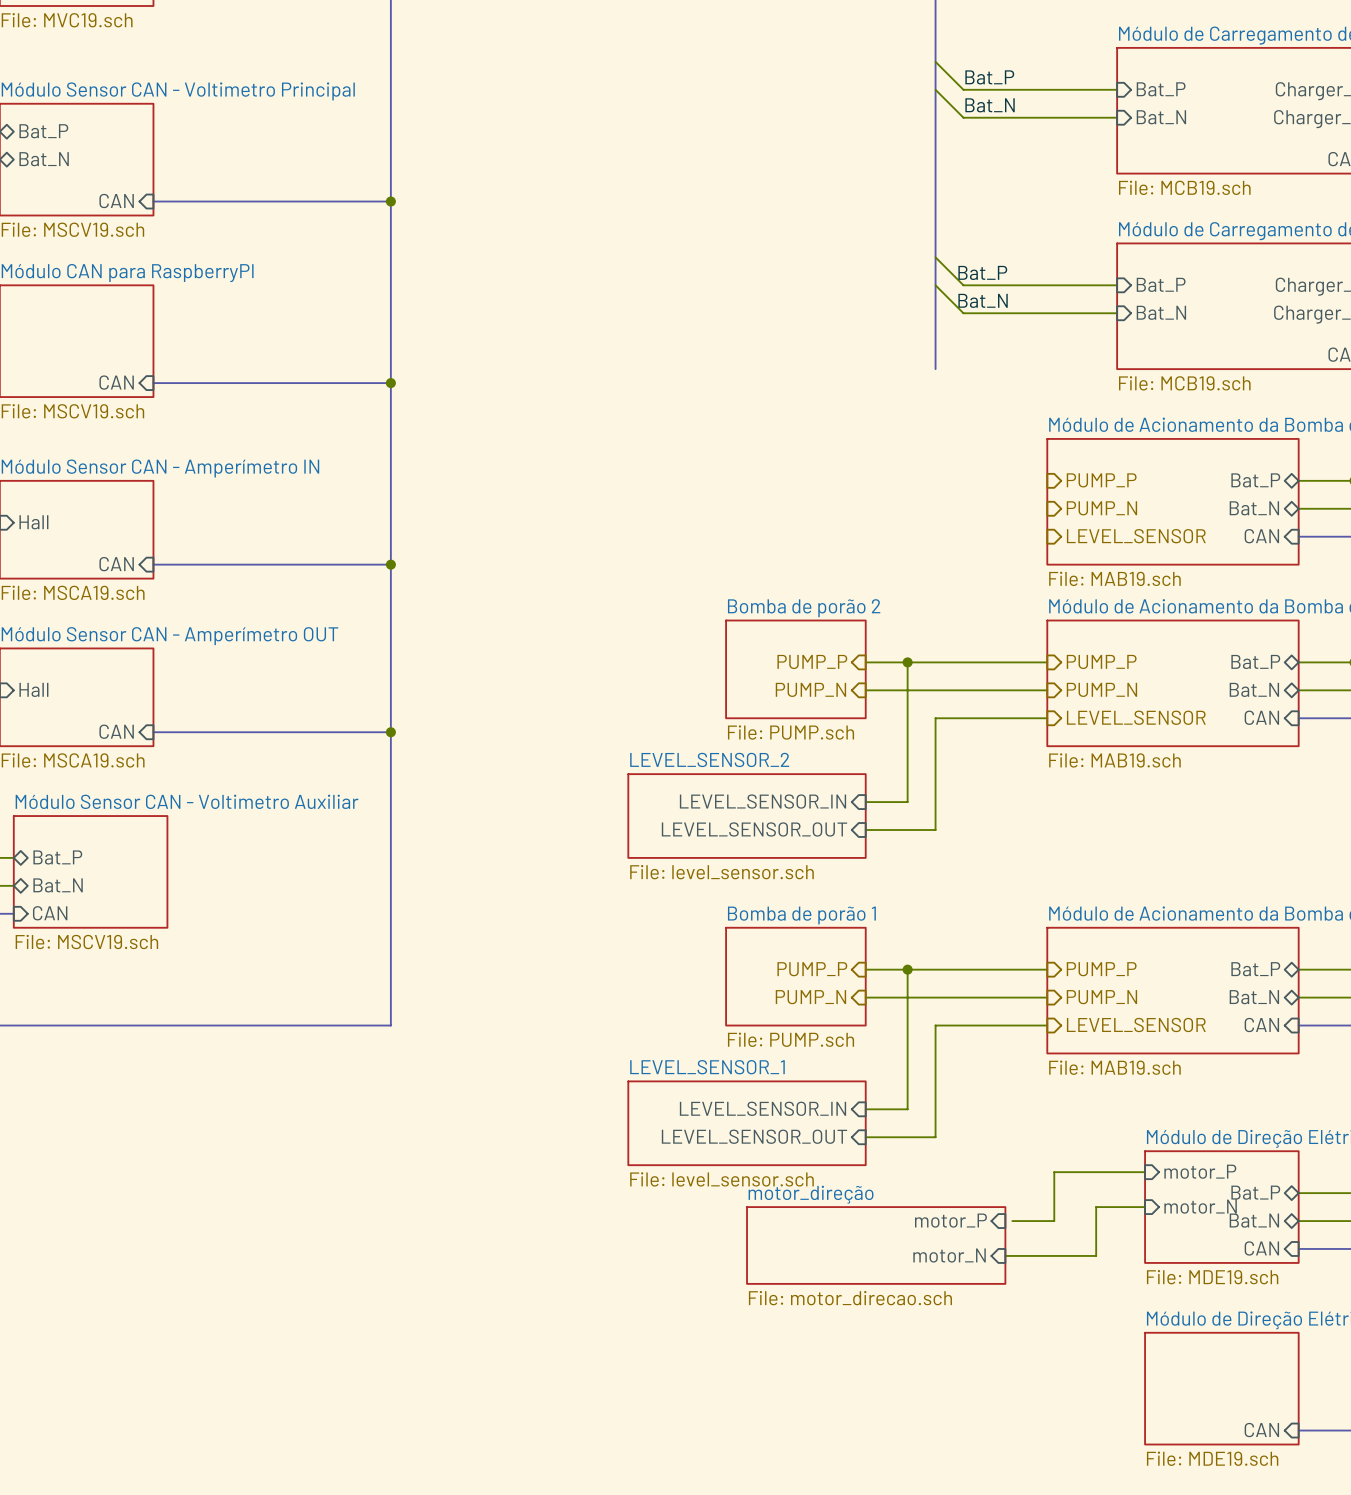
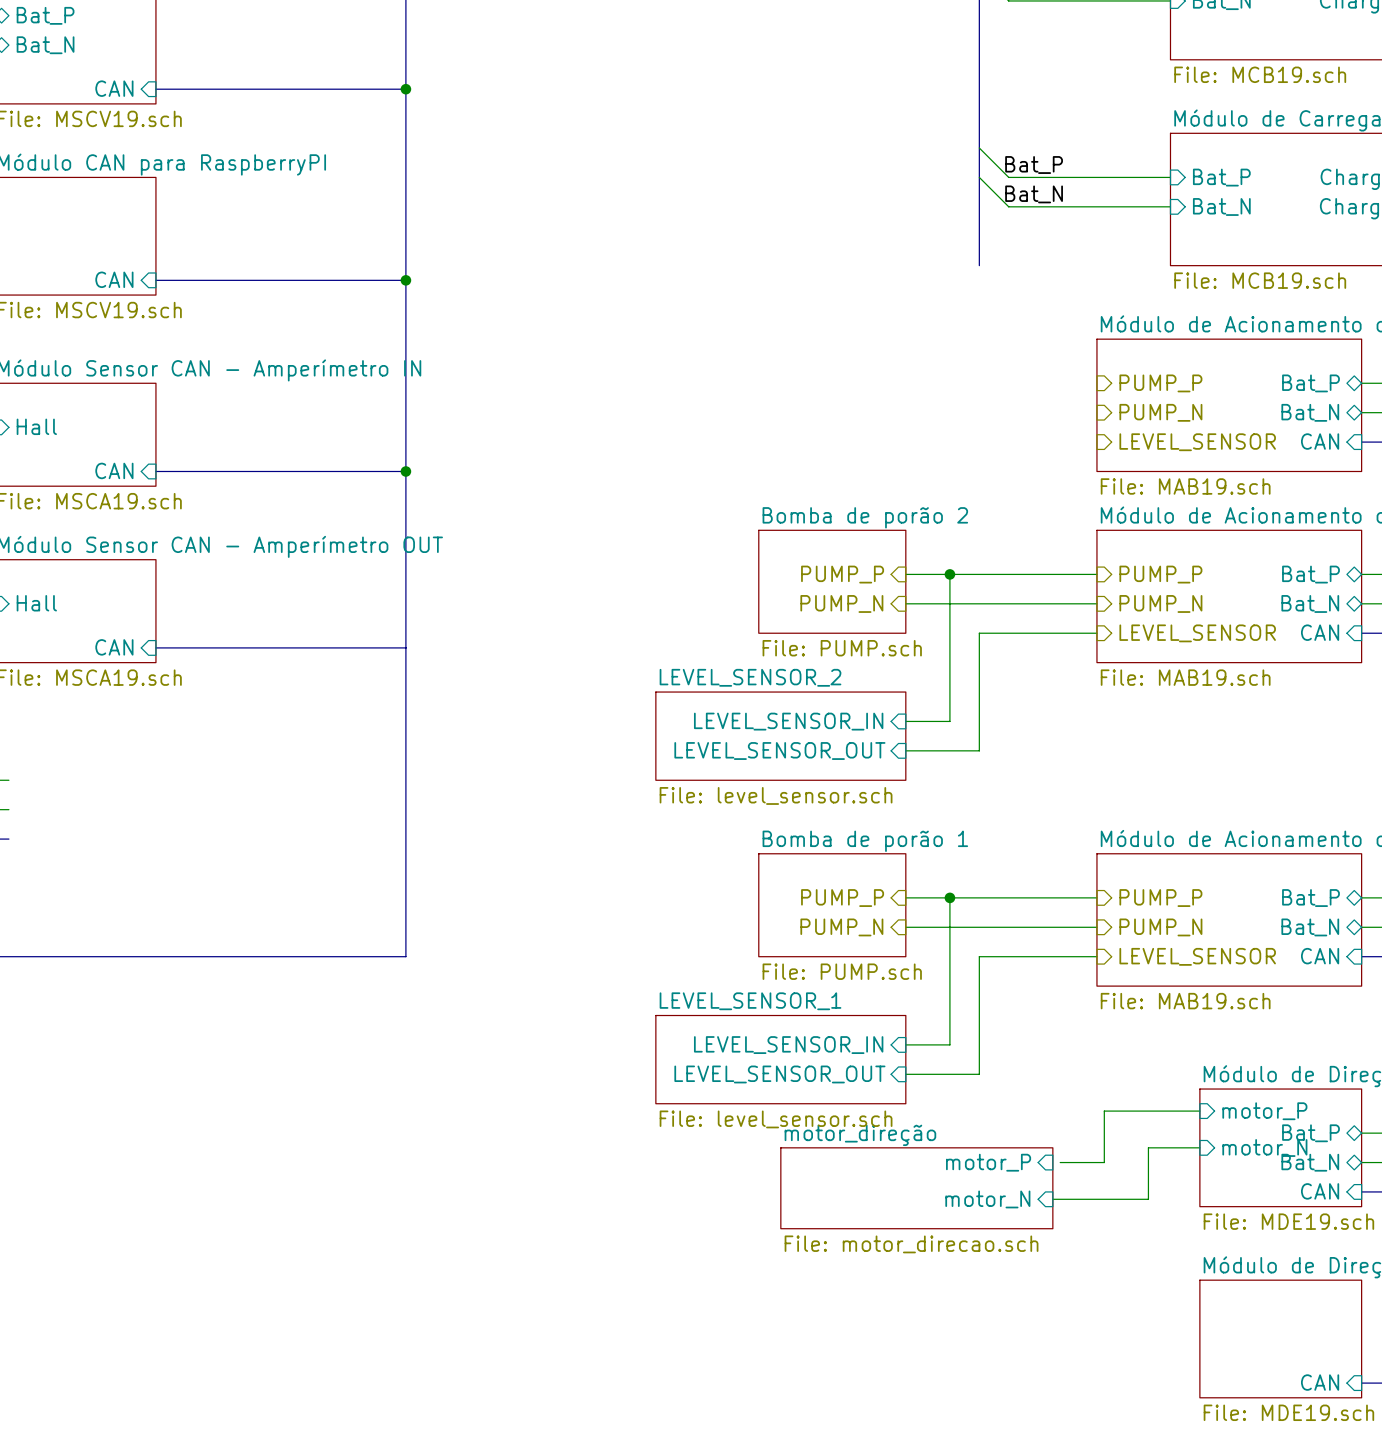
junction: (390, 732) -> none
sheet pin: Bat_P (57, 857) -> none
sheet Módulo Sensor CAN - Voltimetro Auxiliar: File: MSCV19.sch (90, 871) -> none
sheet pin: Bat_N (58, 885) -> none
sheet pin: CAN (50, 913) -> none

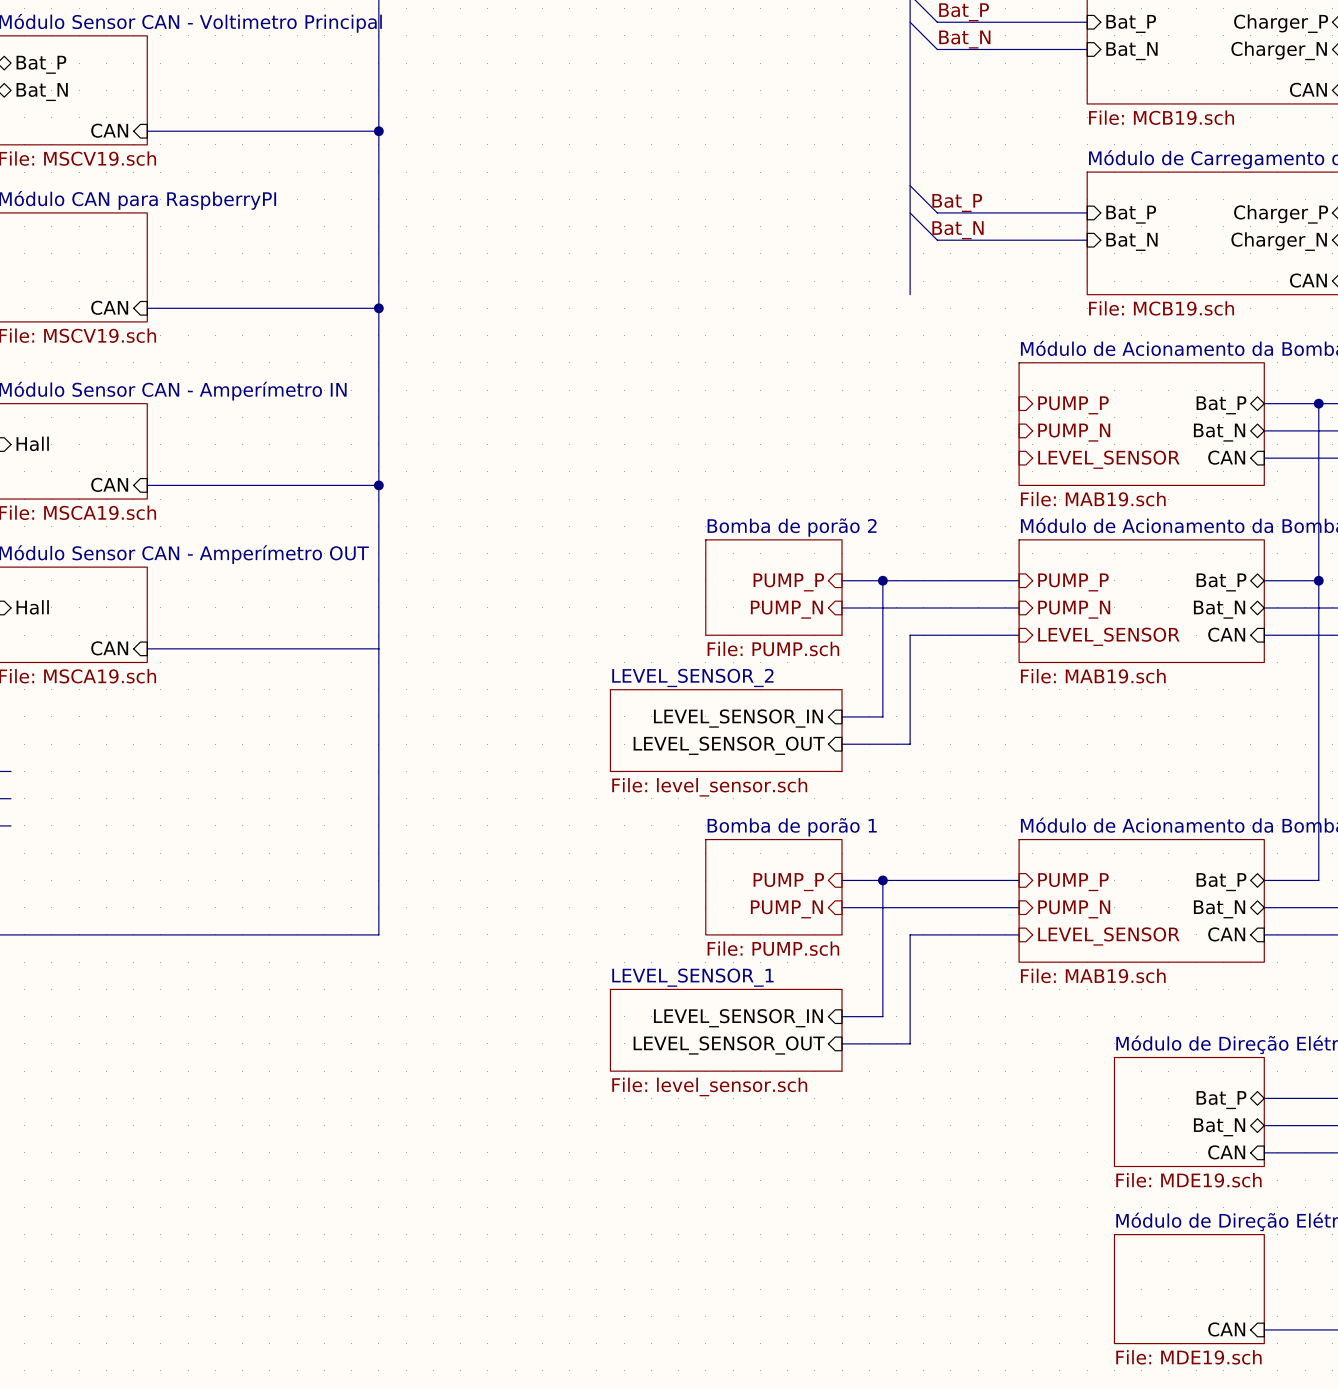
wire: (1199, 1111) (1104, 1111) (1104, 1162) (1060, 1162) -> none
sheet pin: motor_P (1264, 1111) -> none
wire: (1199, 1147) (1148, 1147) (1148, 1199) (1052, 1199) -> none
sheet pin: motor_N (1264, 1147) -> none
sheet pin: motor_P (988, 1162) -> none
sheet motor_direção: File: motor_direcao.sch (916, 1188) -> none
sheet pin: motor_N (987, 1199) -> none

